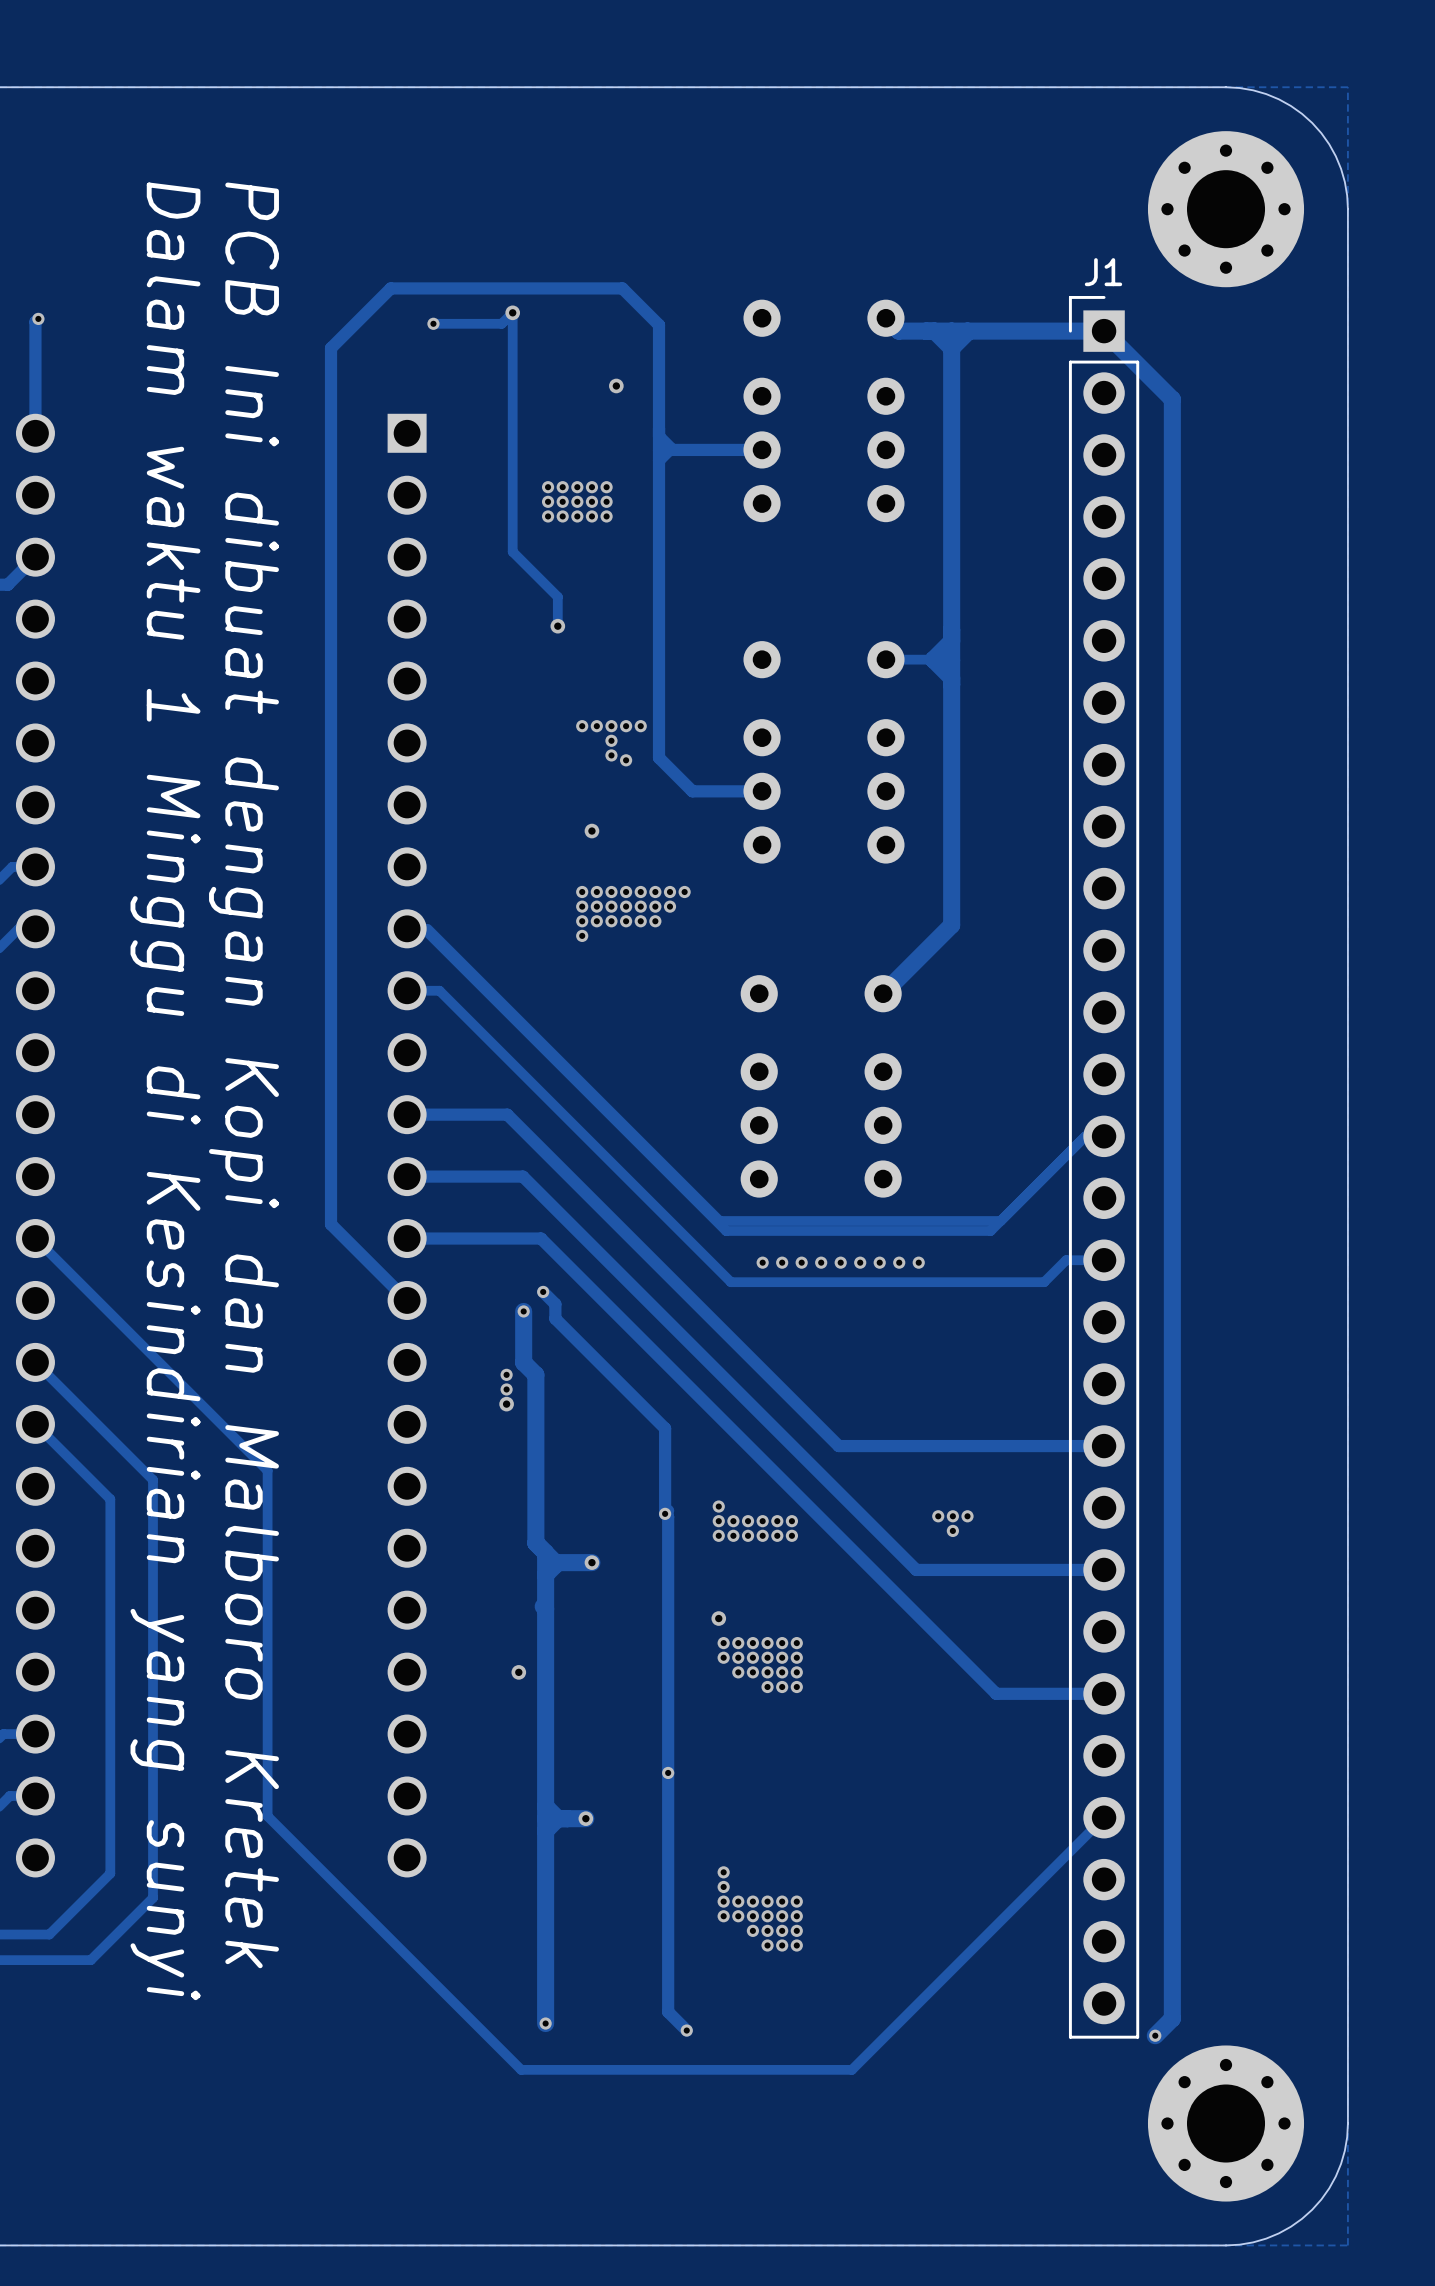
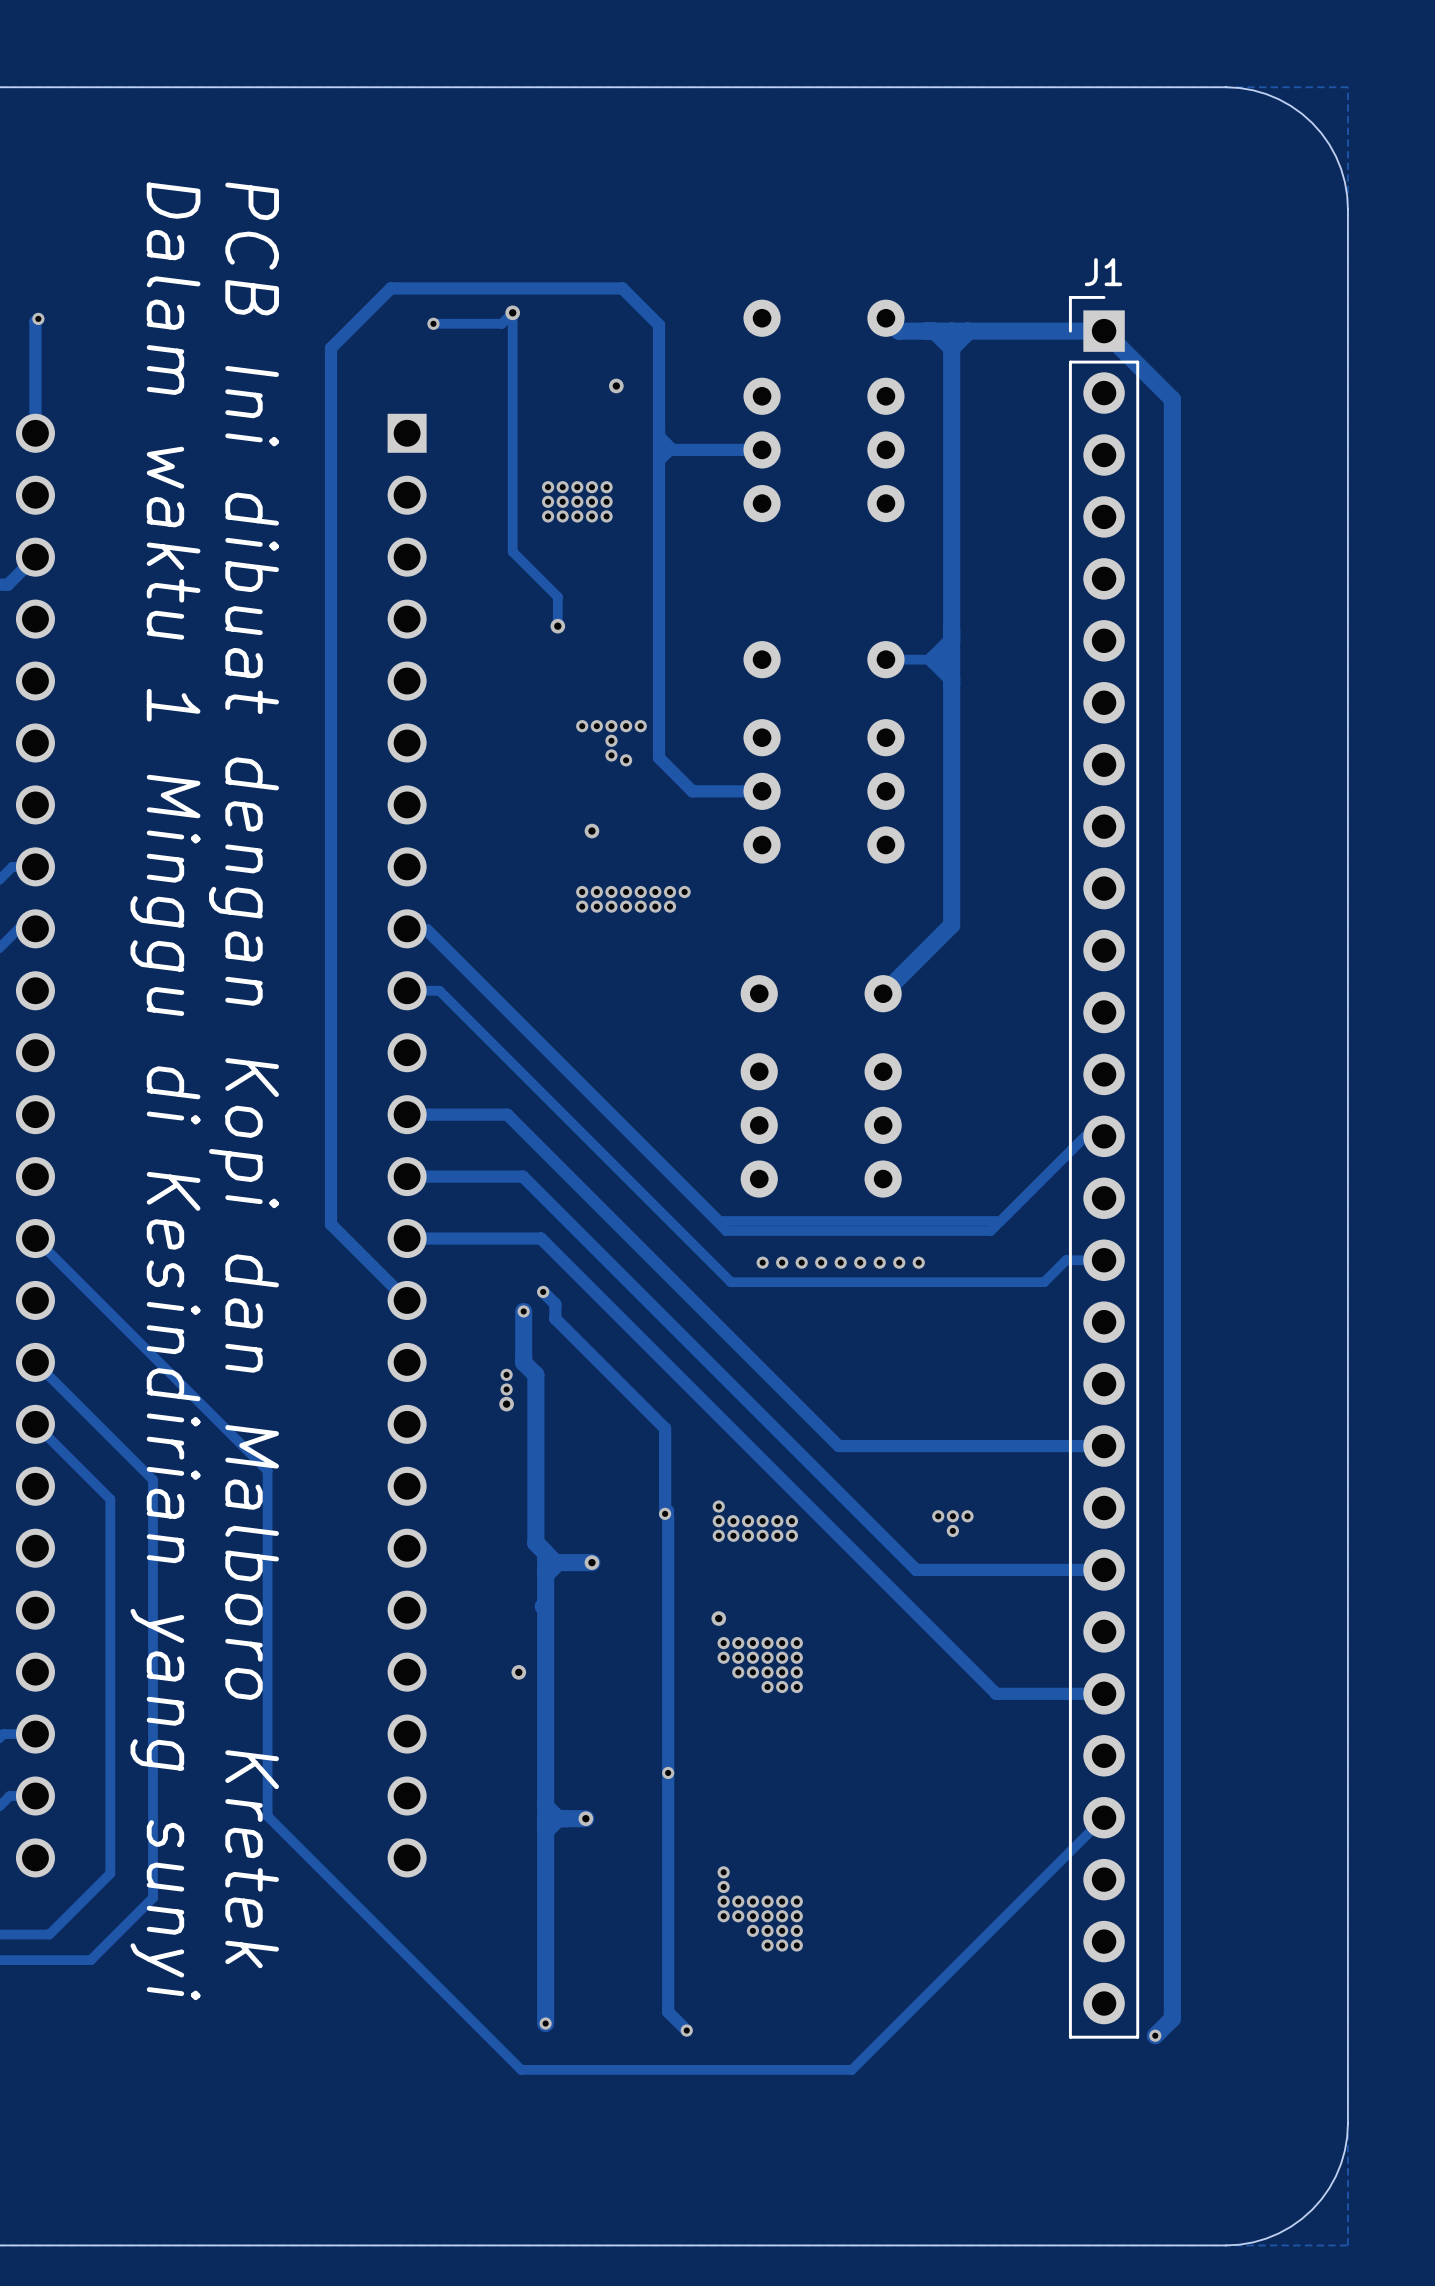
part: (1226, 209) -> none
via: (582, 921) -> none
via: (596, 921) -> none
via: (611, 921) -> none
via: (626, 921) -> none
via: (640, 921) -> none
via: (655, 921) -> none
via: (582, 935) -> none
part: (1226, 2123) -> none

